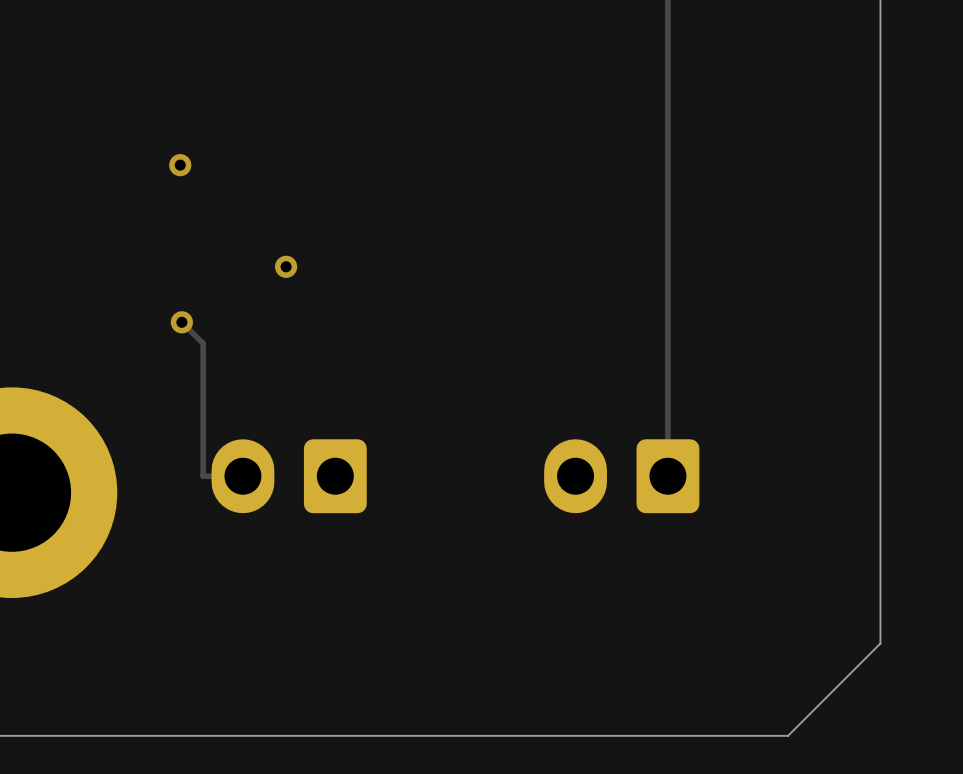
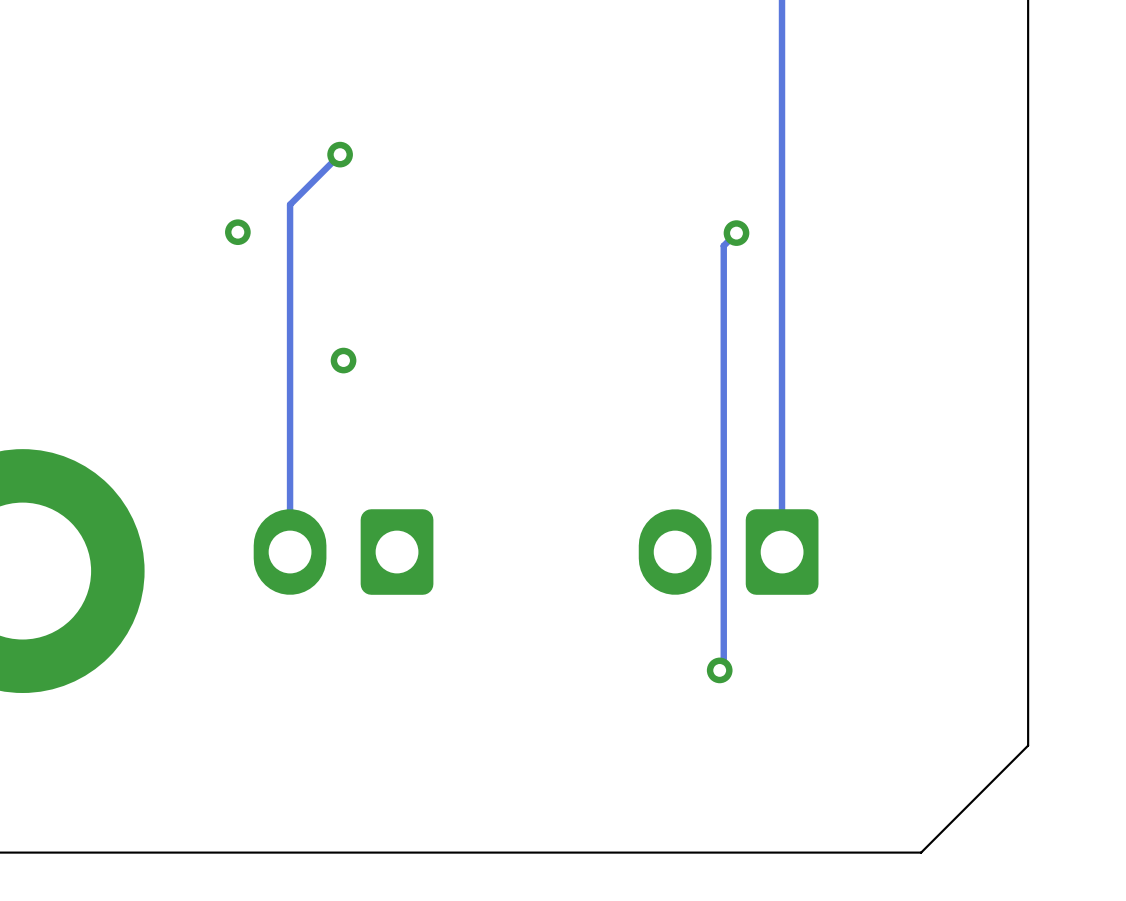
via: none -> (340, 154)
via position: (180, 165) -> (237, 232)
track: none -> (736, 233) (723, 245) (723, 666) (719, 670)
via: none -> (736, 233)
via position: (286, 266) -> (343, 360)
track: (181, 322) (203, 343) (203, 476) (242, 476) -> (340, 154) (290, 204) (290, 552)
via: (181, 322) -> none
via: none -> (719, 670)

